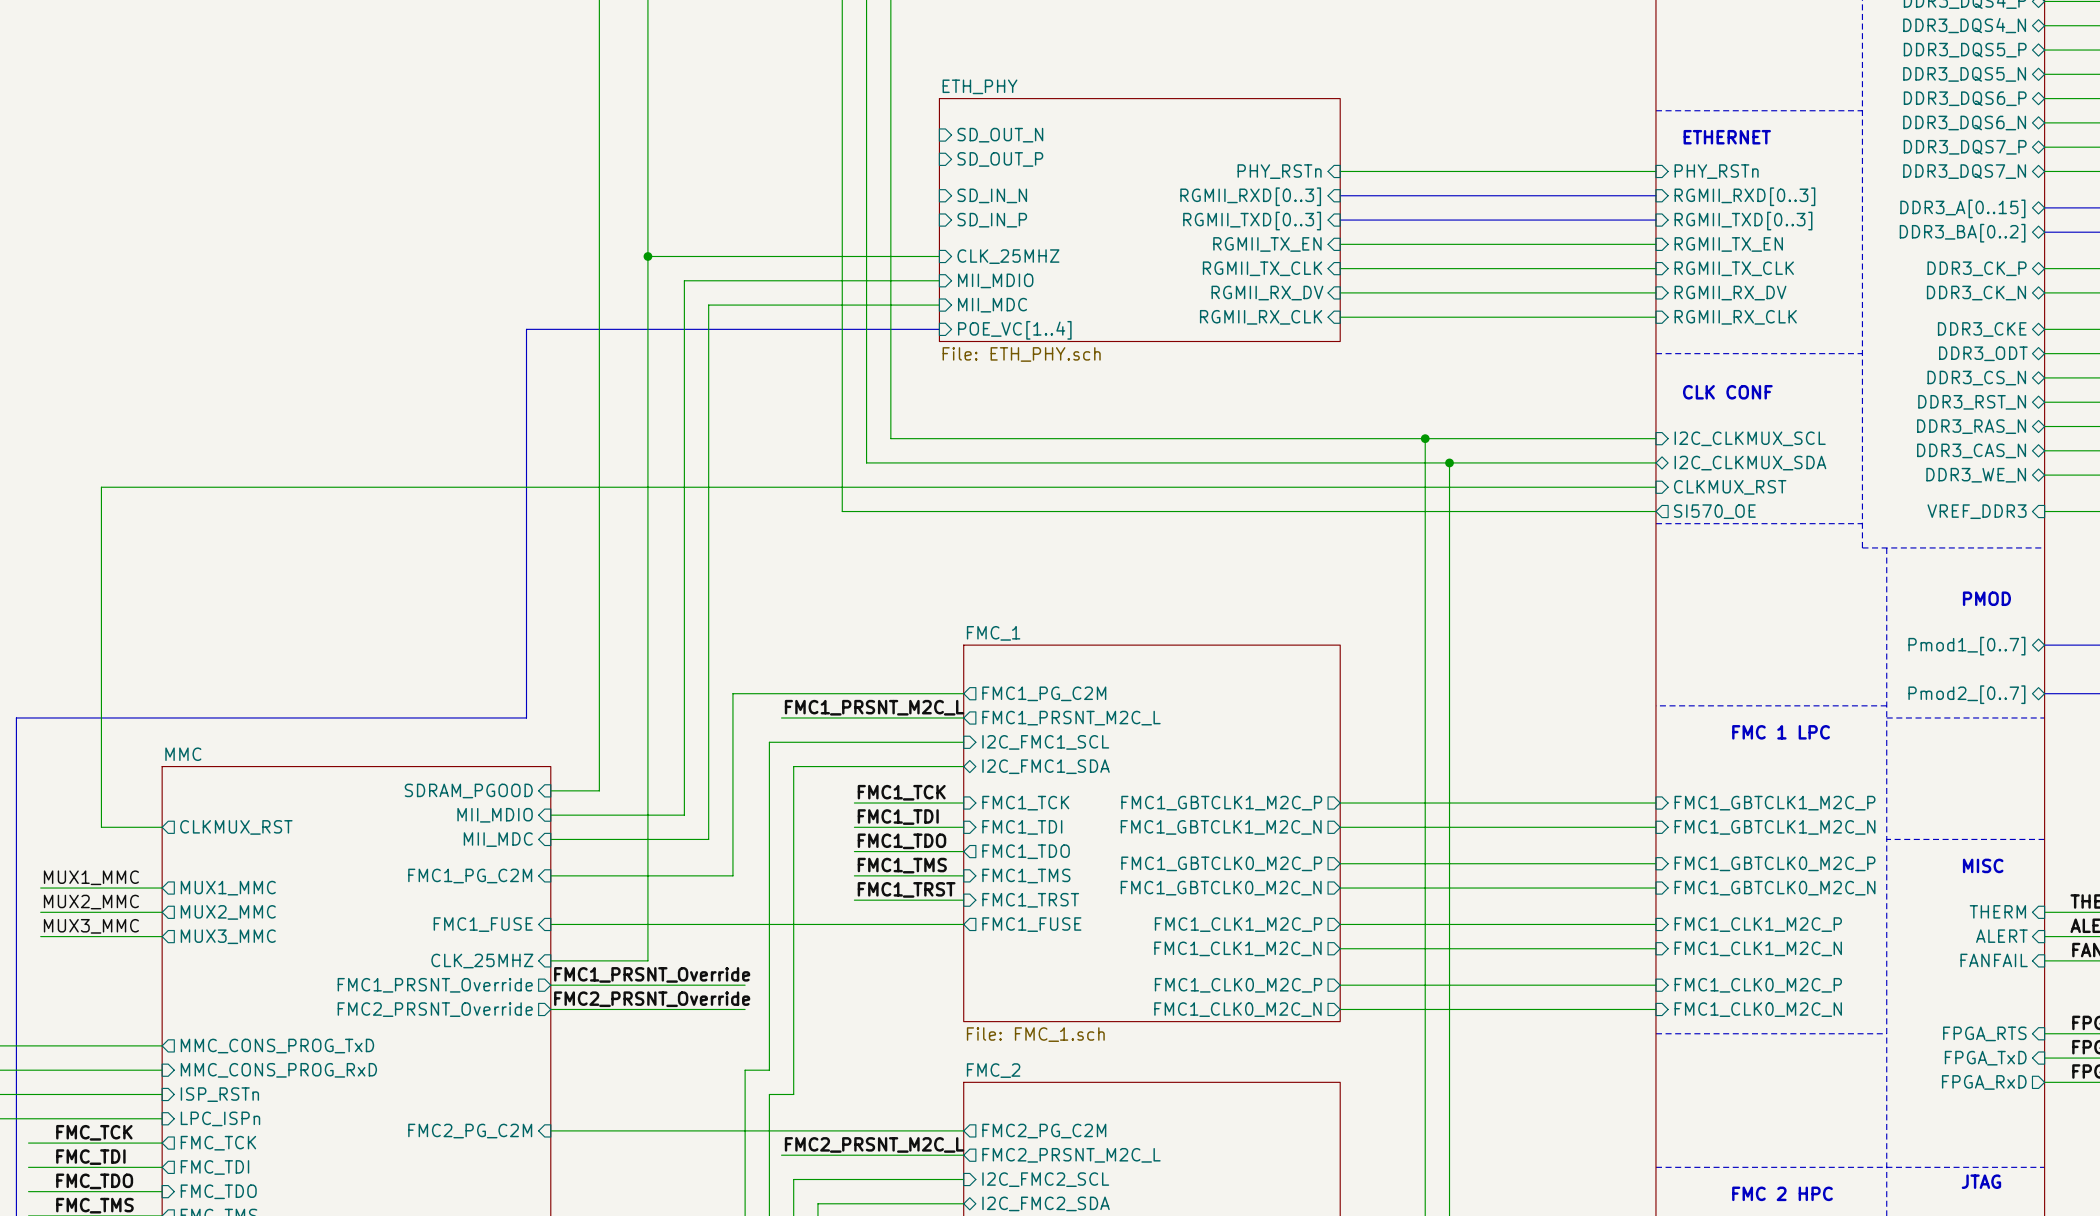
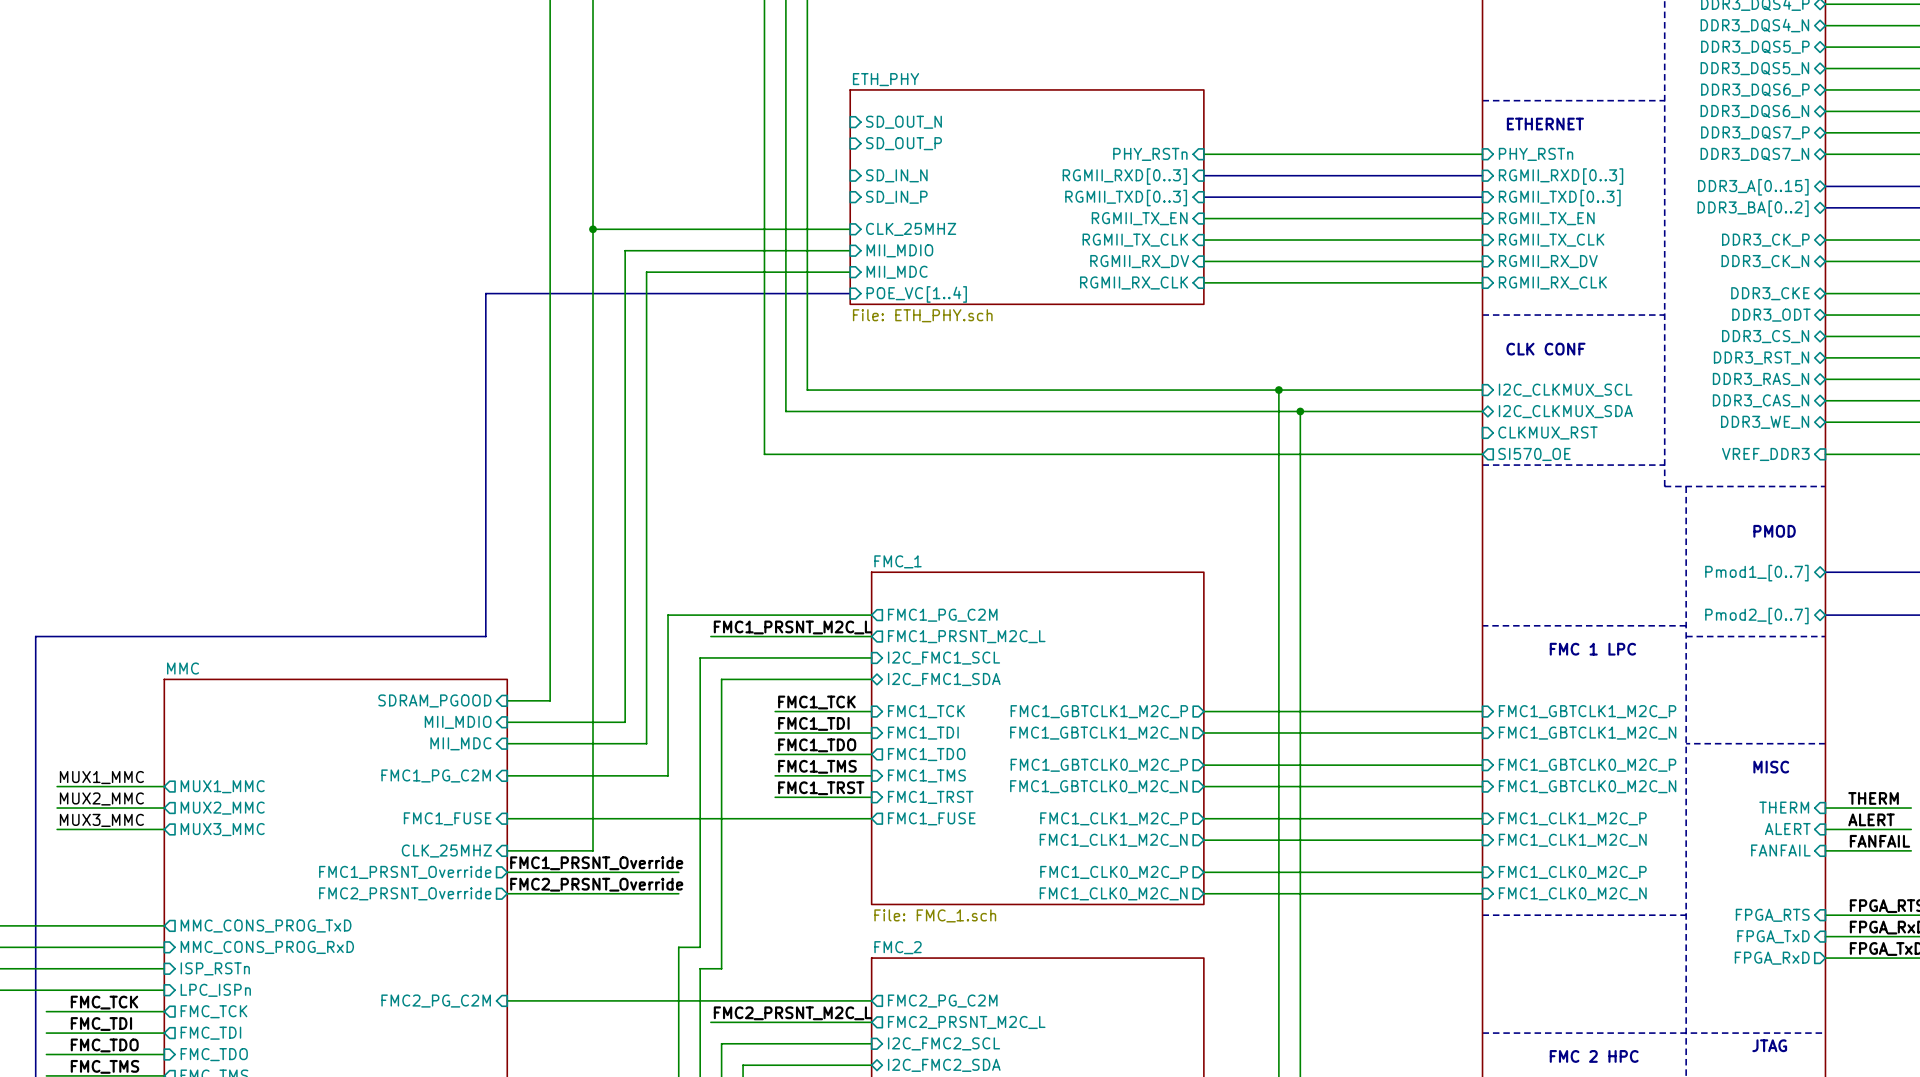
wire: (1655, 487) (101, 487) (101, 827) (162, 827) -> none
sheet pin: CLKMUX_RST (236, 827) -> none

